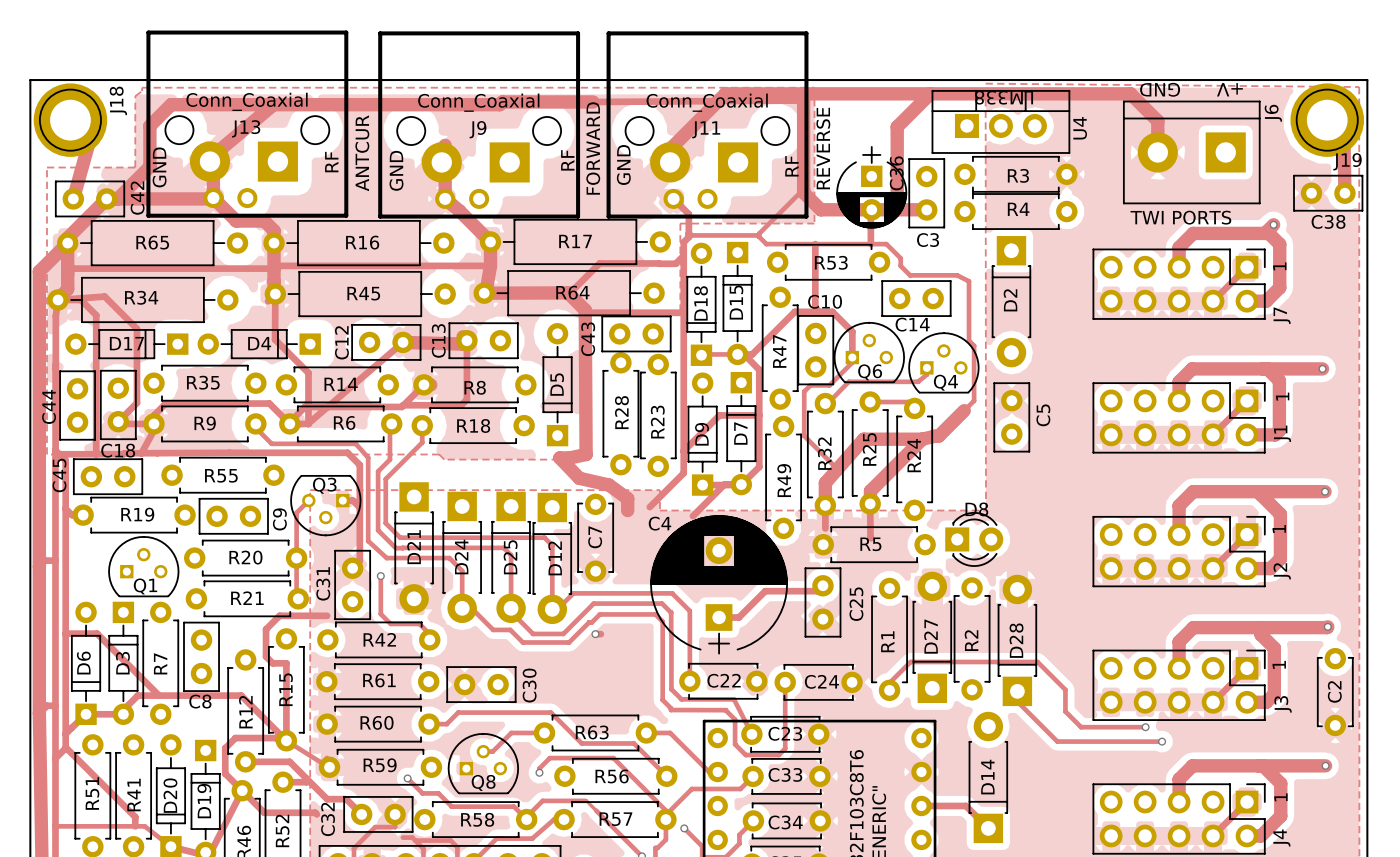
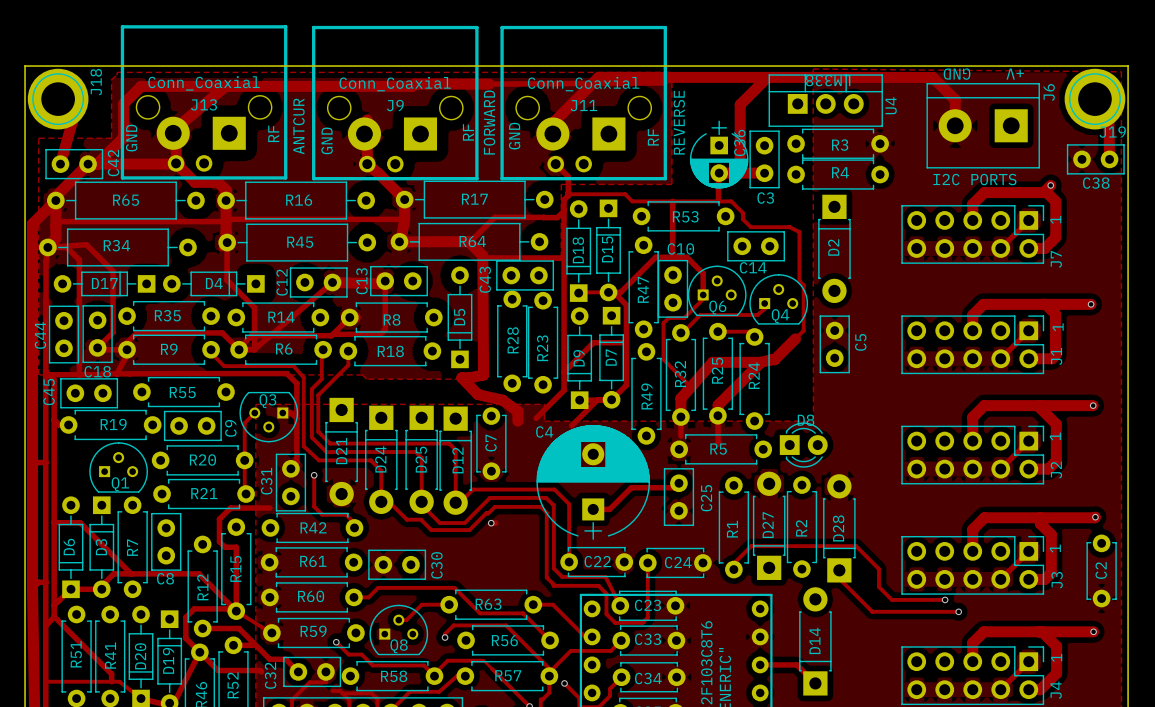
track: (803, 93) (803, 192) (820, 209) (871, 209) -> none
track: (803, 189) (759, 233) (759, 236) -> none
text: TWI PORTS (1180, 217) -> I2C PORTS (974, 179)

